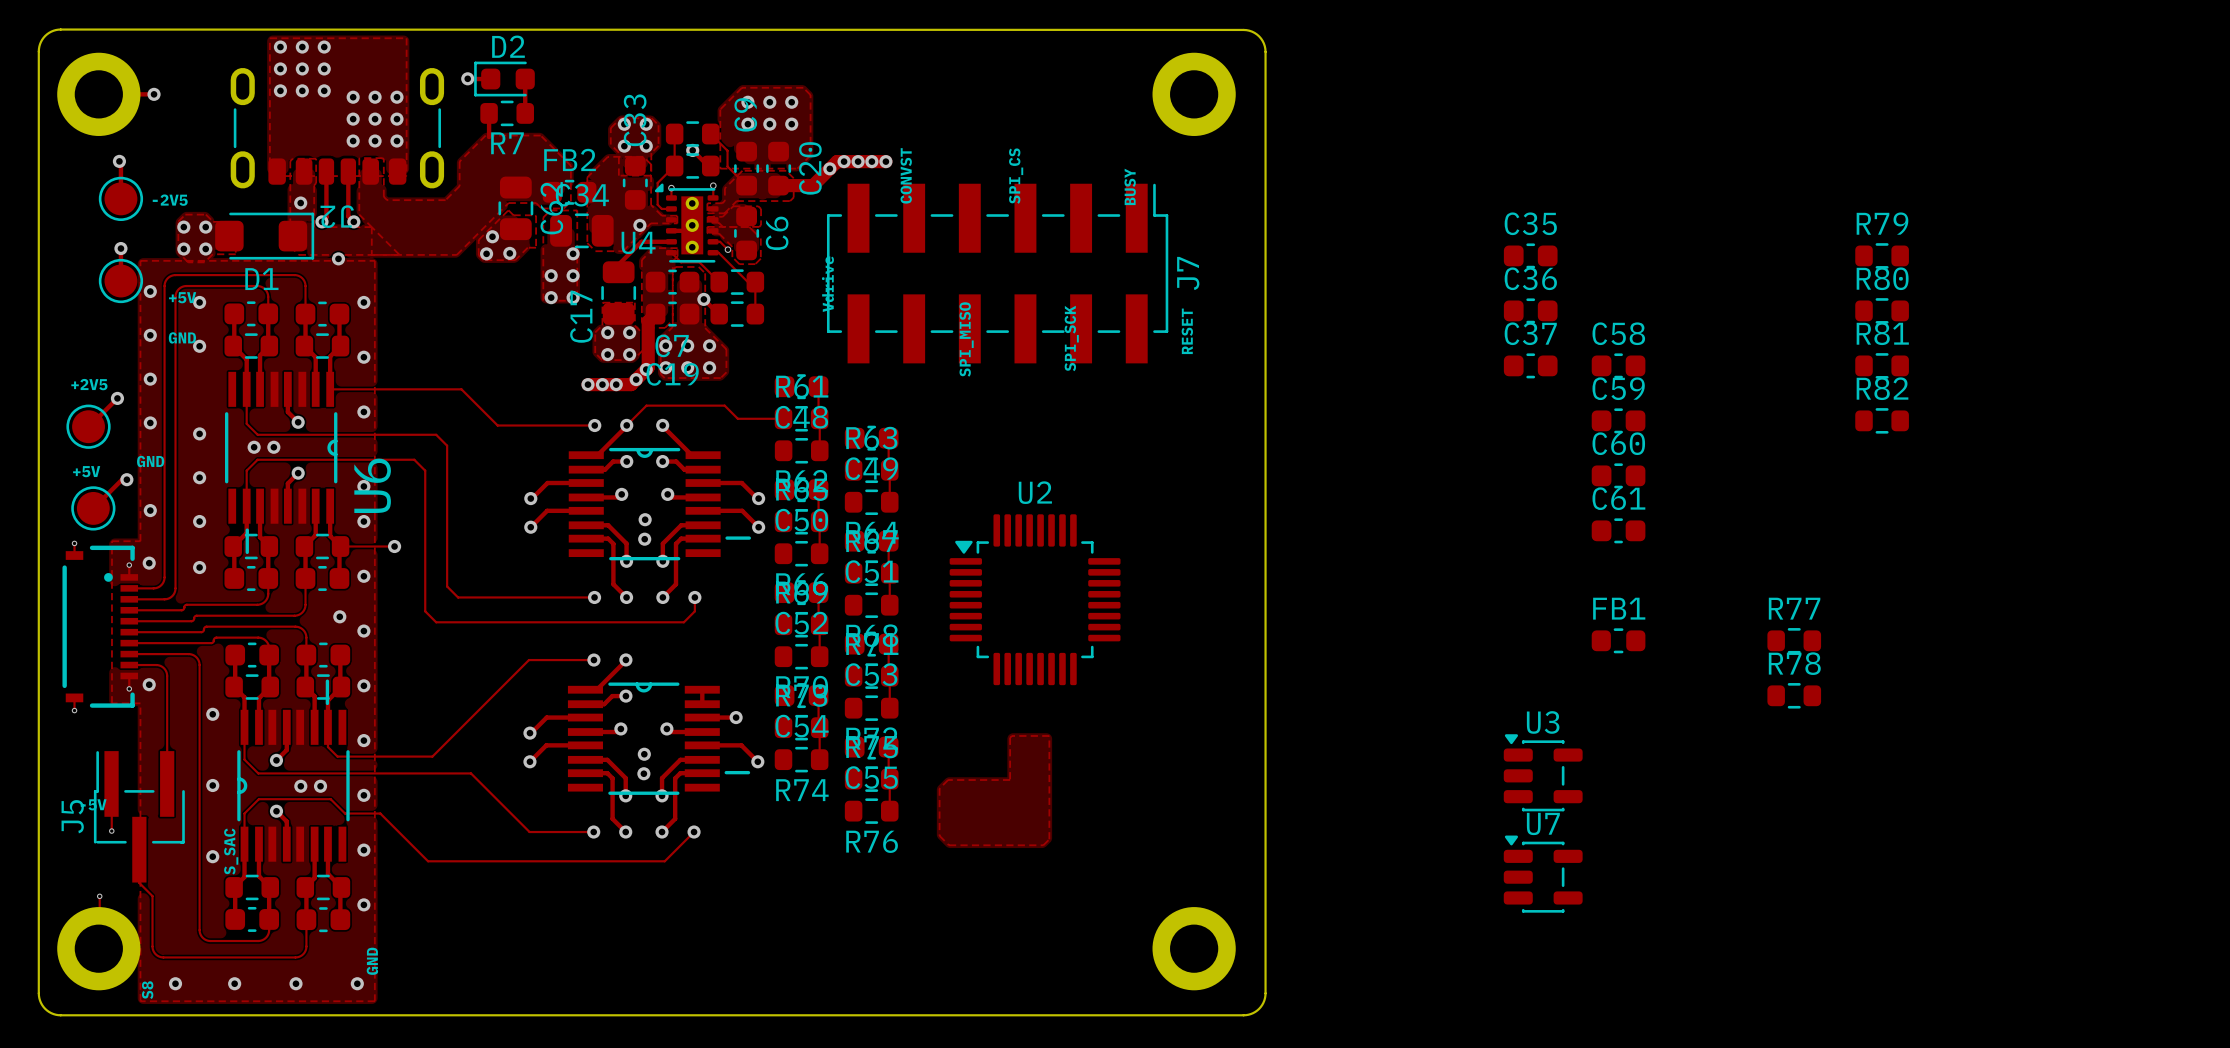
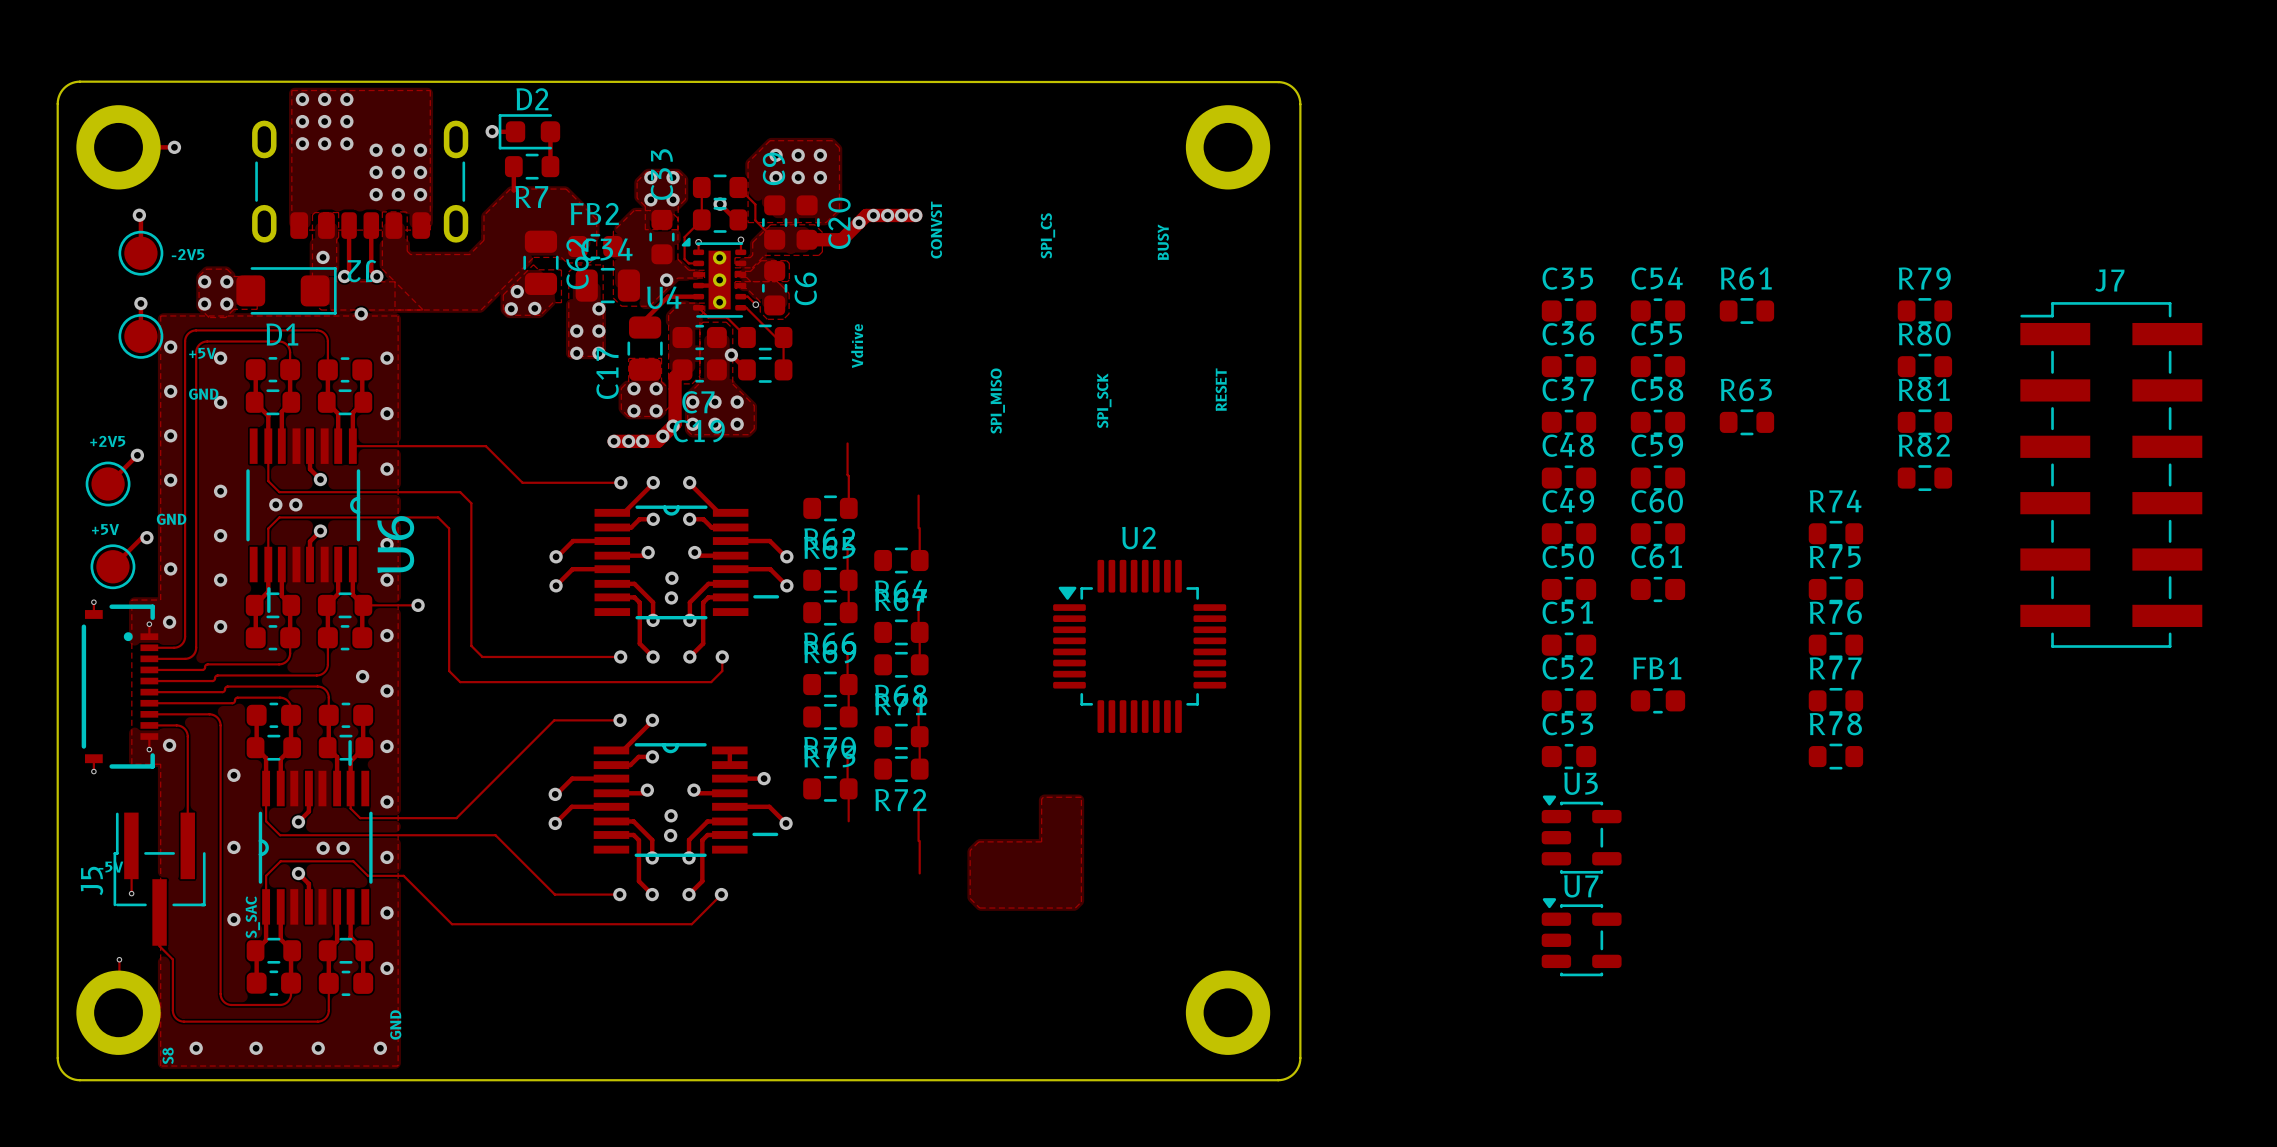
J7 rotation: 0° (997, 273) -> 90° counterclockwise (2111, 474)
J7 position: (997, 273) -> (2111, 474)
C48 position: (801, 386) -> (1568, 478)
C48 name position: C48 (801, 417) -> C48 (1568, 445)
track: (783, 418) (737, 418) (724, 405) (646, 405) (626, 425) -> none
R61 position: (801, 418) -> (1746, 310)
C49 position: (871, 438) -> (1568, 533)
C49 name position: C49 (871, 468) -> C49 (1568, 501)
R63 position: (871, 470) -> (1746, 422)
C50 position: (801, 489) -> (1568, 589)
C50 name position: C50 (801, 520) -> C50 (1568, 557)
C51 position: (871, 541) -> (1568, 645)
C51 name position: C51 (872, 571) -> C51 (1567, 612)
C52 position: (801, 592) -> (1568, 700)
U2 position: (1035, 599) -> (1139, 646)
C52 name position: C52 (801, 623) -> C52 (1567, 668)
C53 position: (871, 644) -> (1568, 756)
C53 name position: C53 (871, 674) -> C53 (1567, 724)
C54 position: (801, 695) -> (1657, 310)
C54 name position: C54 (802, 726) -> C54 (1657, 278)
C55 position: (871, 747) -> (1657, 366)
R74 position: (801, 759) -> (1835, 533)
C55 name position: C55 (871, 777) -> C55 (1656, 334)
R75 position: (871, 779) -> (1835, 589)
R74 name position: R74 (802, 790) -> R74 (1835, 501)
R76 position: (871, 811) -> (1835, 645)
R76 name position: R76 (872, 841) -> R76 (1835, 612)

